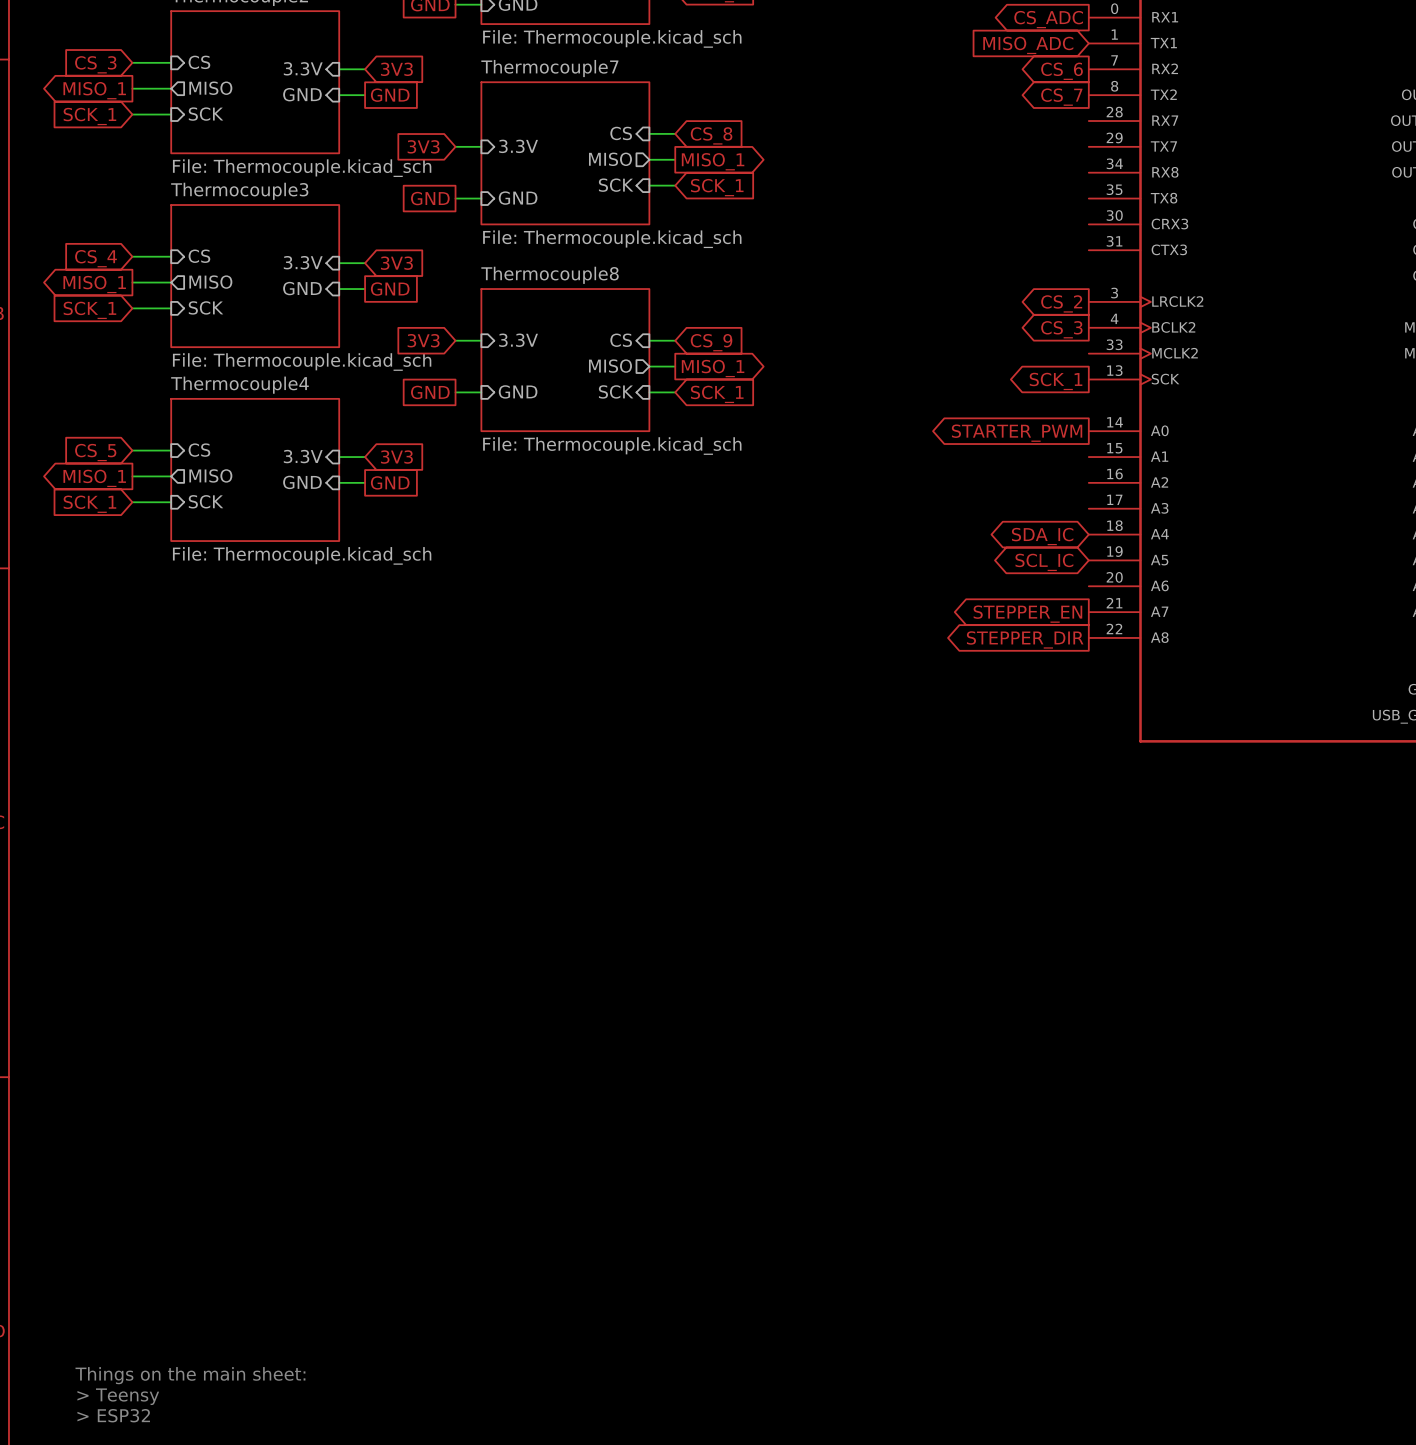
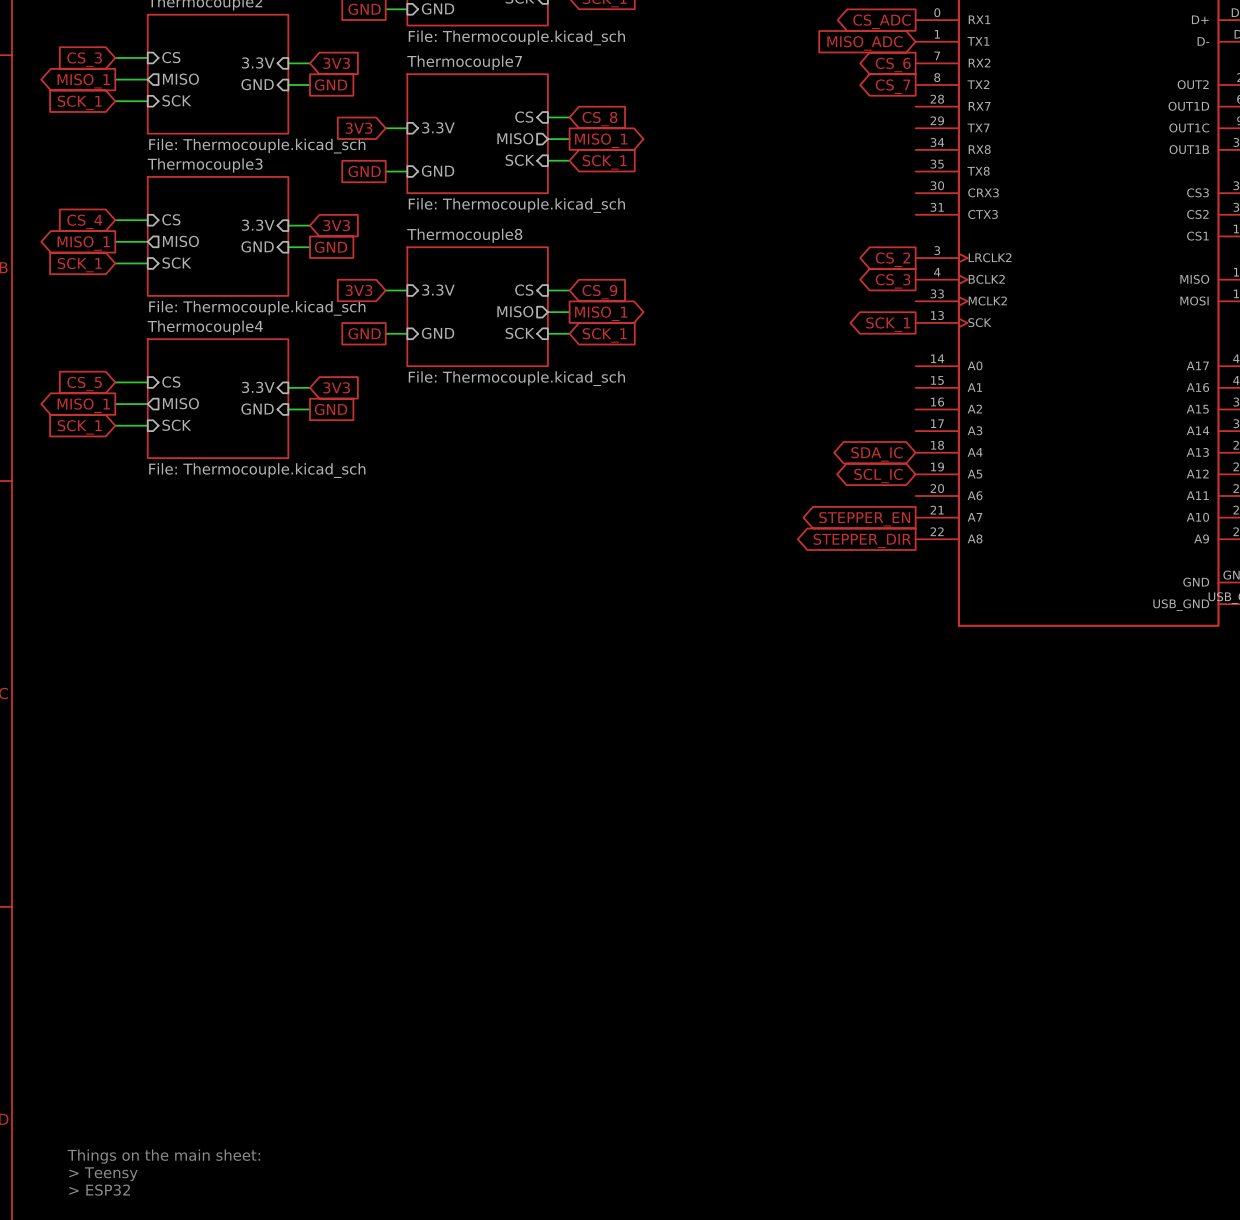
global label: STARTER_PWM (1017, 433) -> none

